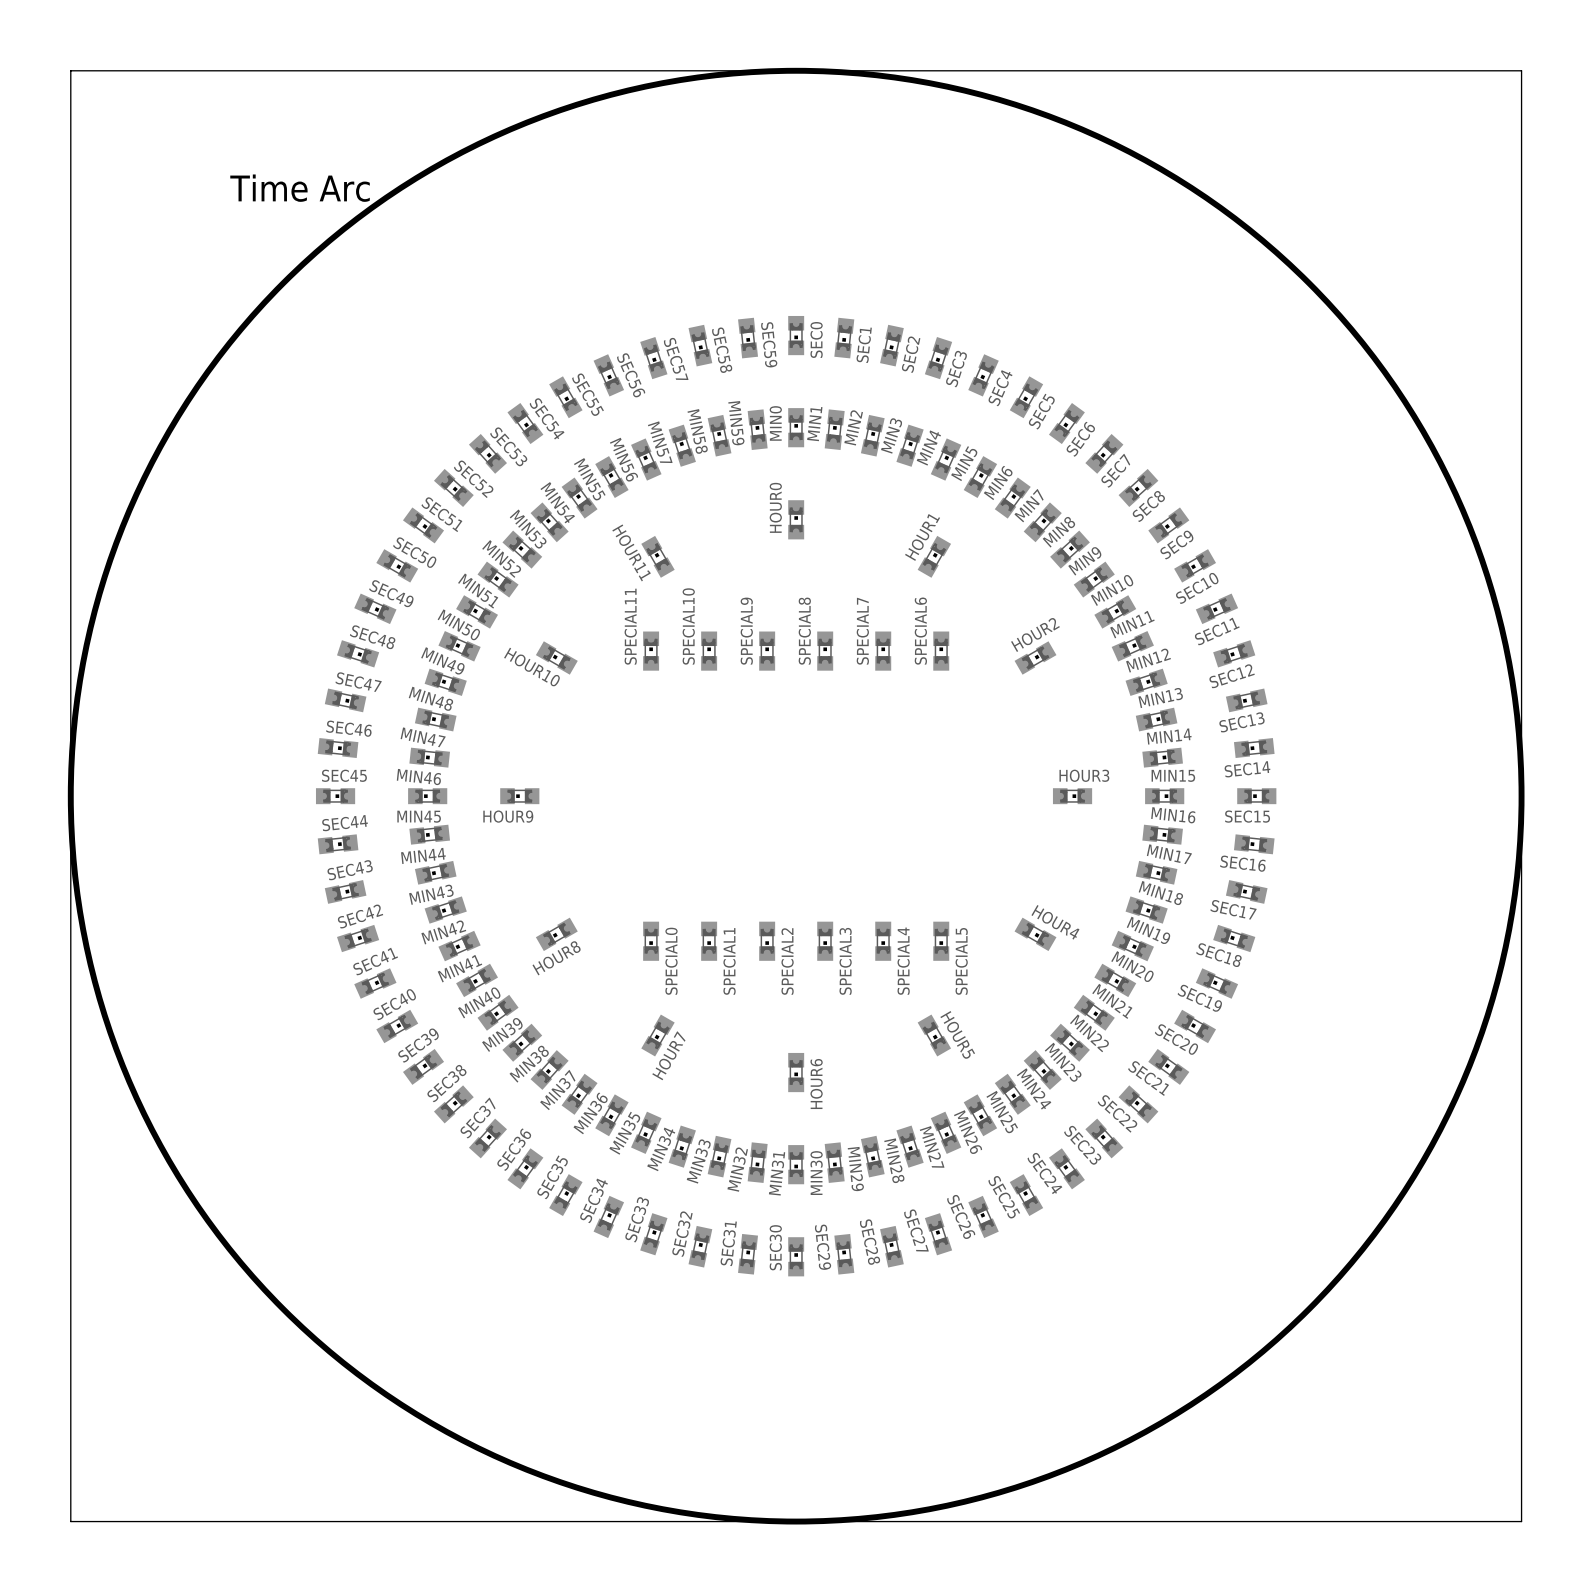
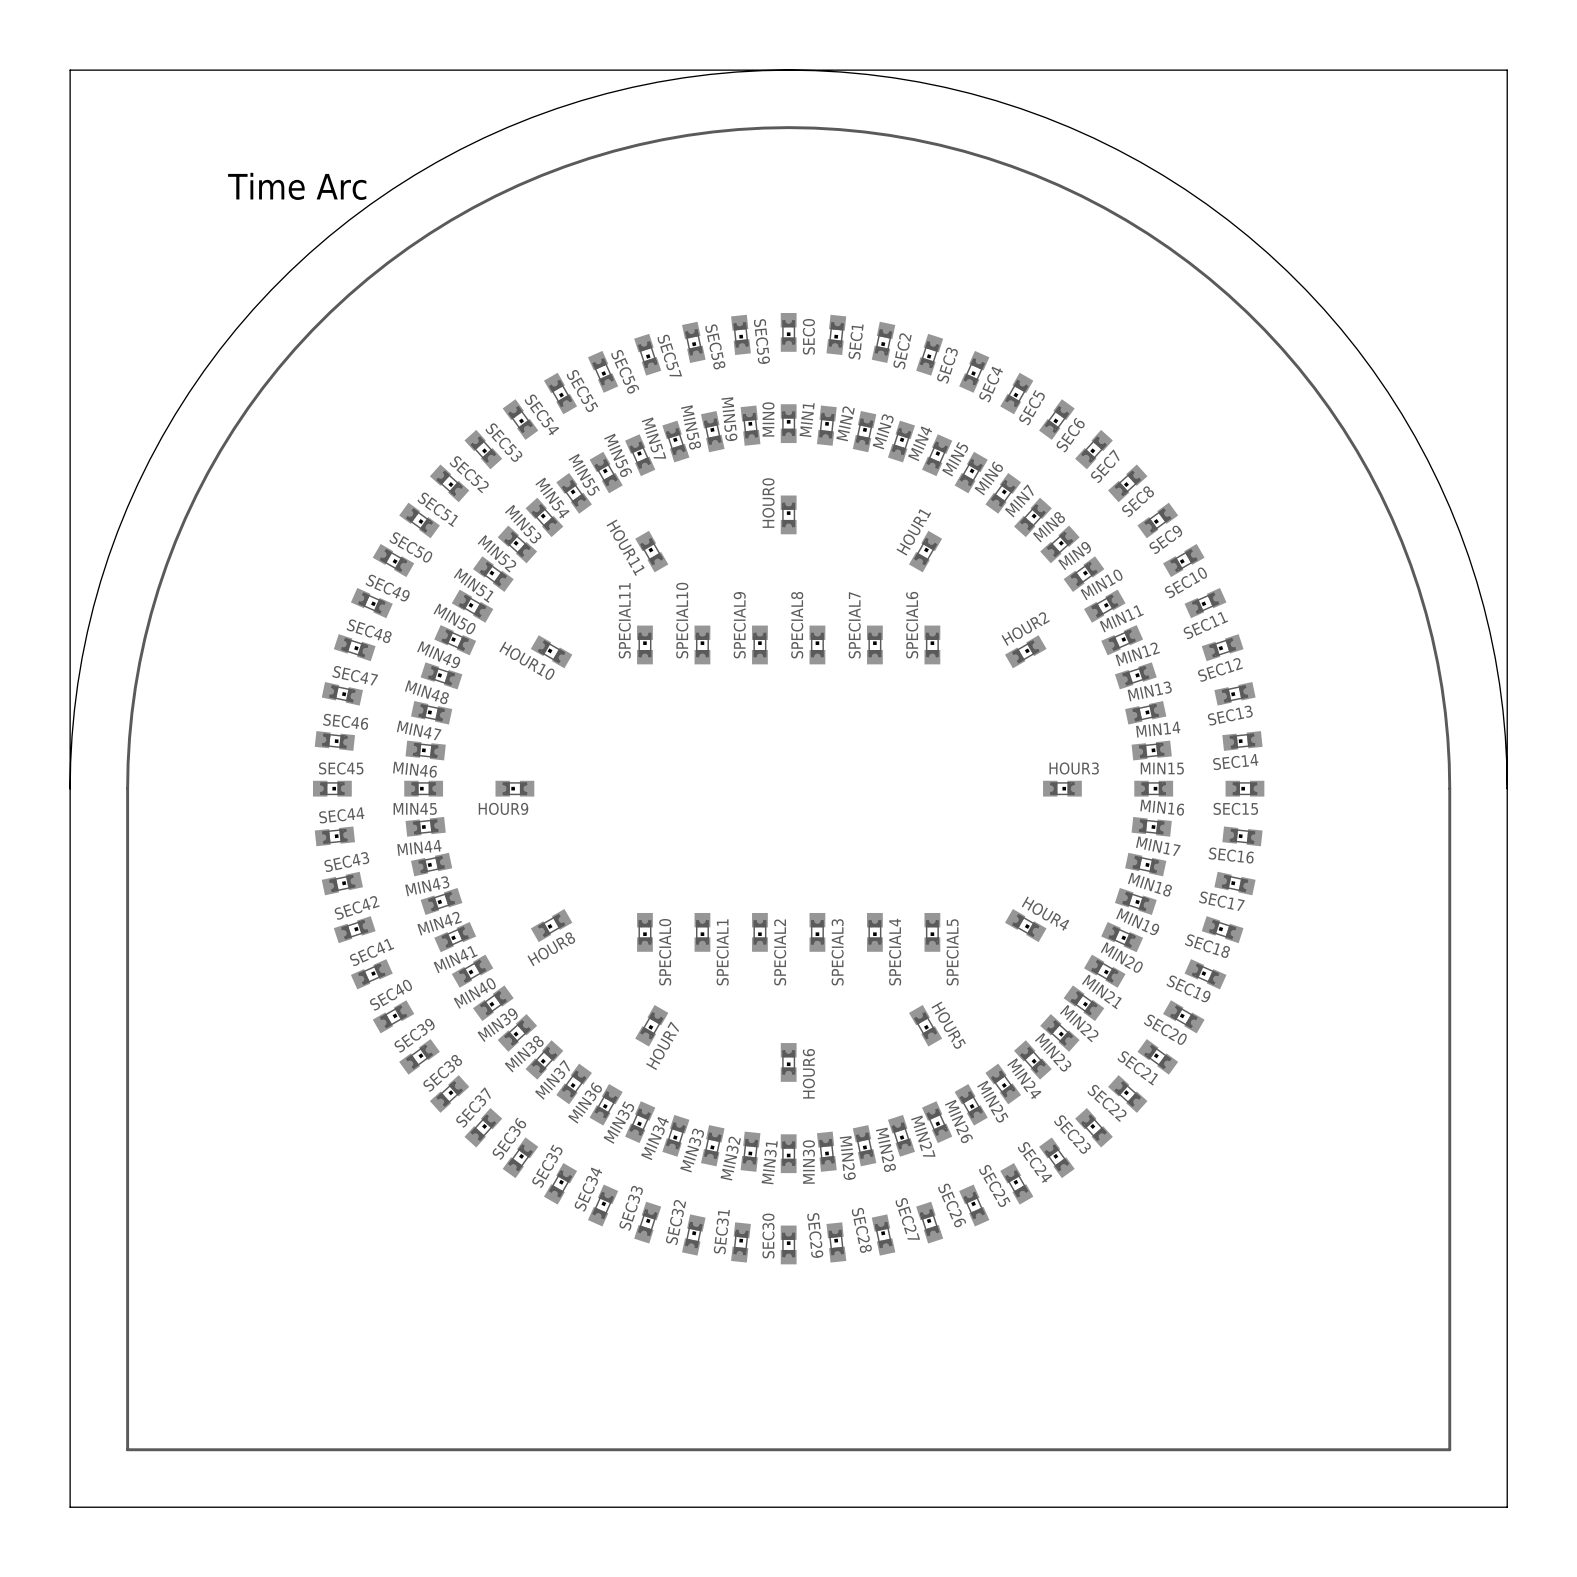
round board edge: [67, 67, 1525, 1525] -> none
board edge: none -> (70, 788) (72, 736) (82, 658) (93, 606) (117, 531) (149, 460) (175, 414) (219, 349) (271, 289) (329, 236) (392, 189) (437, 162) (507, 127) (581, 100) (658, 82) (736, 72) (788, 70) (841, 72) (919, 82) (970, 93) (1045, 117) (1117, 149) (1163, 175) (1227, 219) (1287, 271) (1340, 329) (1387, 392) (1415, 437) (1449, 507) (1476, 581) (1495, 658) (1505, 736) (1507, 788)
line: none -> (127, 788) (127, 1449) (1449, 1449) (1449, 763) (1442, 687) (1426, 613) (1401, 541) (1369, 472) (1329, 408) (1298, 368) (1247, 312) (1189, 262) (1126, 220) (1082, 196) (1012, 166) (963, 151) (914, 139) (839, 129) (763, 128) (687, 135) (613, 151) (565, 166) (518, 185) (450, 220) (387, 262) (348, 295) (312, 330) (278, 368) (247, 408) (207, 472) (175, 541) (151, 613) (135, 687) (129, 738) (127, 788)

